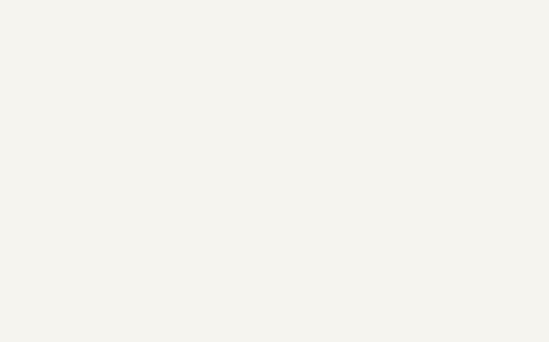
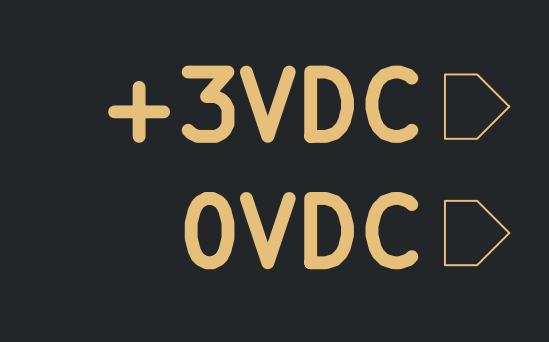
hierarchical label: none -> +3VDC (263, 104)
hierarchical label: none -> 0VDC (301, 230)

